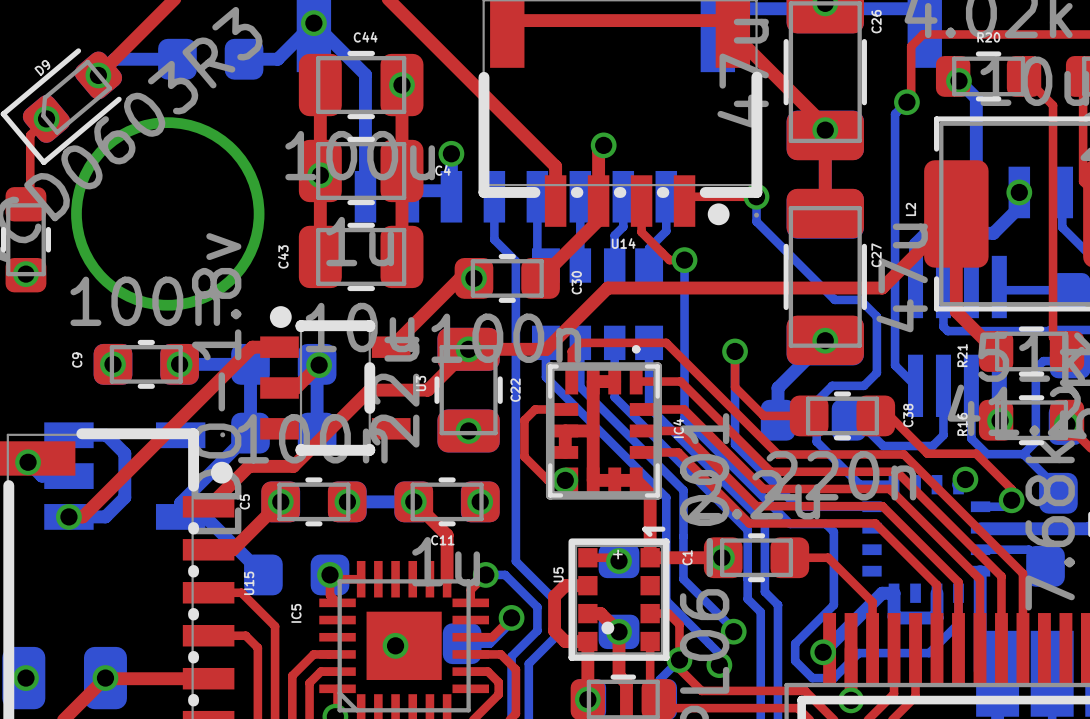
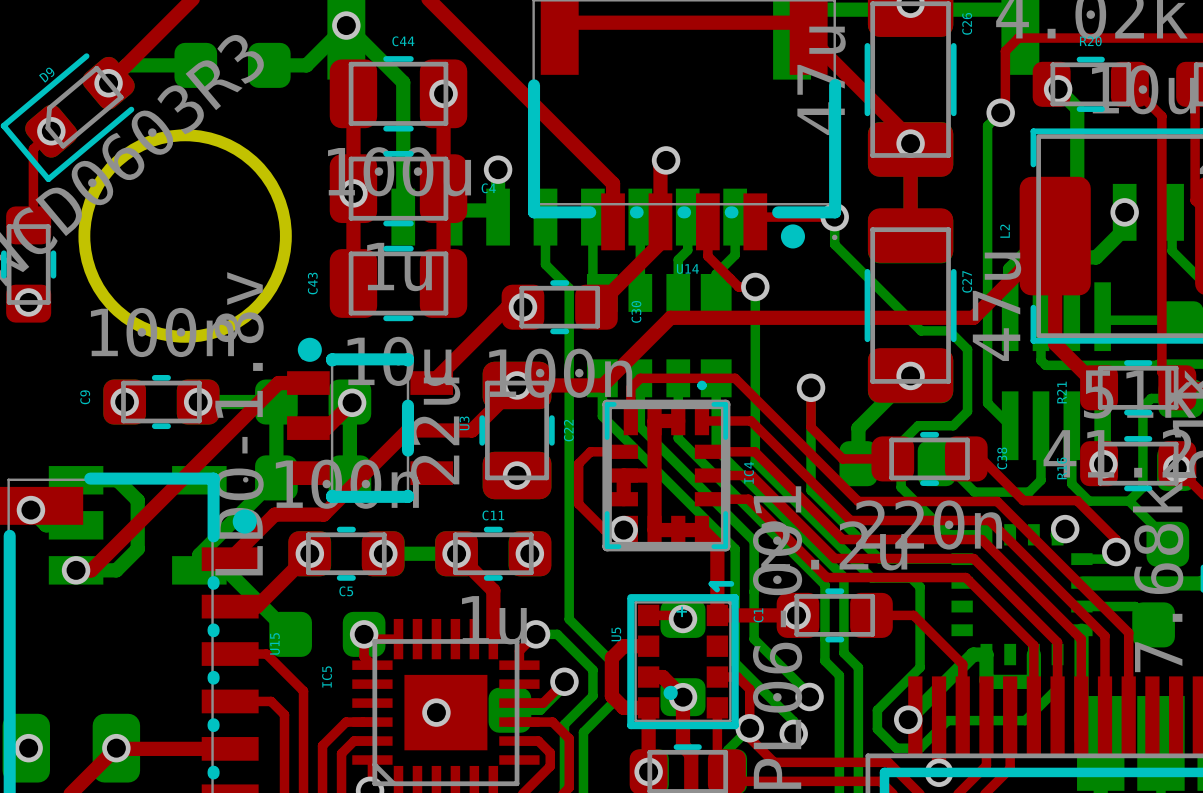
C5 name rotation: 0° (244, 501) -> 90° clockwise (346, 591)
C5 name position: C5 (244, 501) -> C5 (346, 591)
C11 name position: C11 (442, 540) -> C11 (493, 515)

